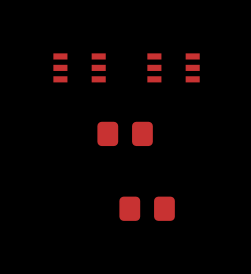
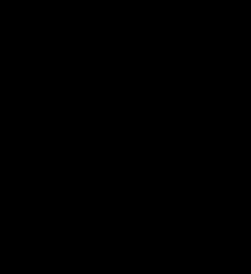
part: (79, 67) -> none
part: (173, 67) -> none
part: (125, 133) -> none
part: (147, 208) -> none

